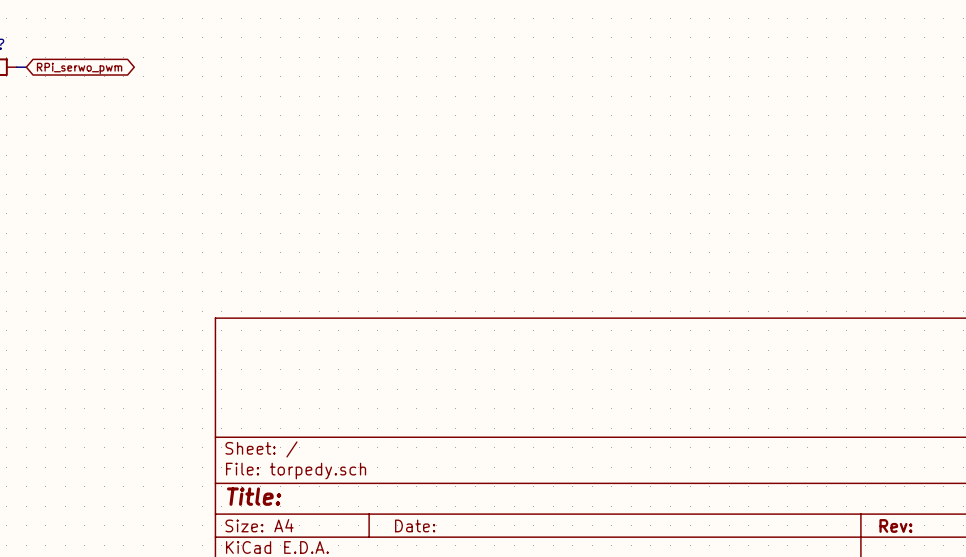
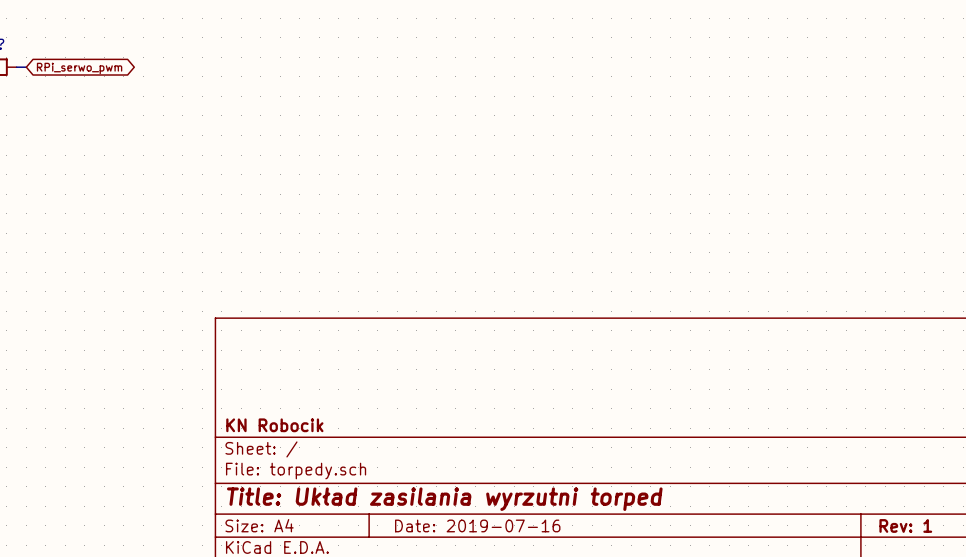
title block: none -> KN Robocik (274, 425)
title block: Title: (254, 496) -> Title: Układ zasilania wyrzutni torped (444, 499)
title block: Date: (415, 525) -> Date: 2019-07-16 (477, 525)
title block: Rev: (895, 525) -> Rev: 1 (905, 525)

